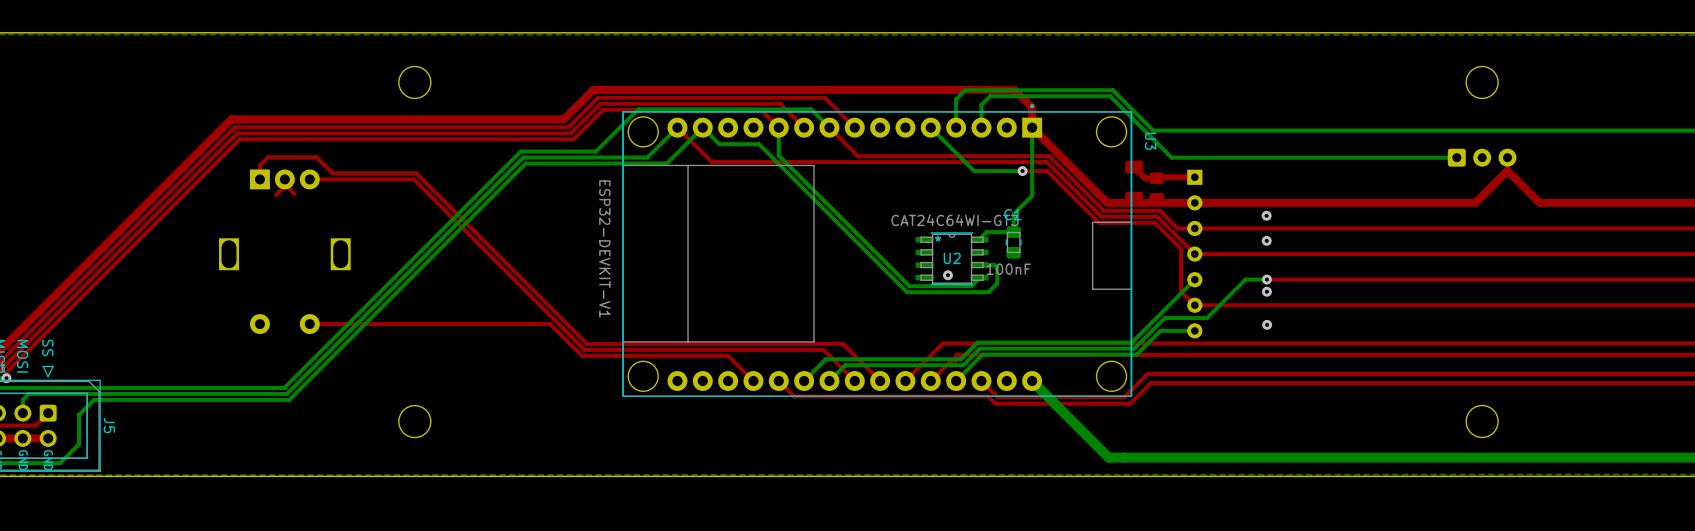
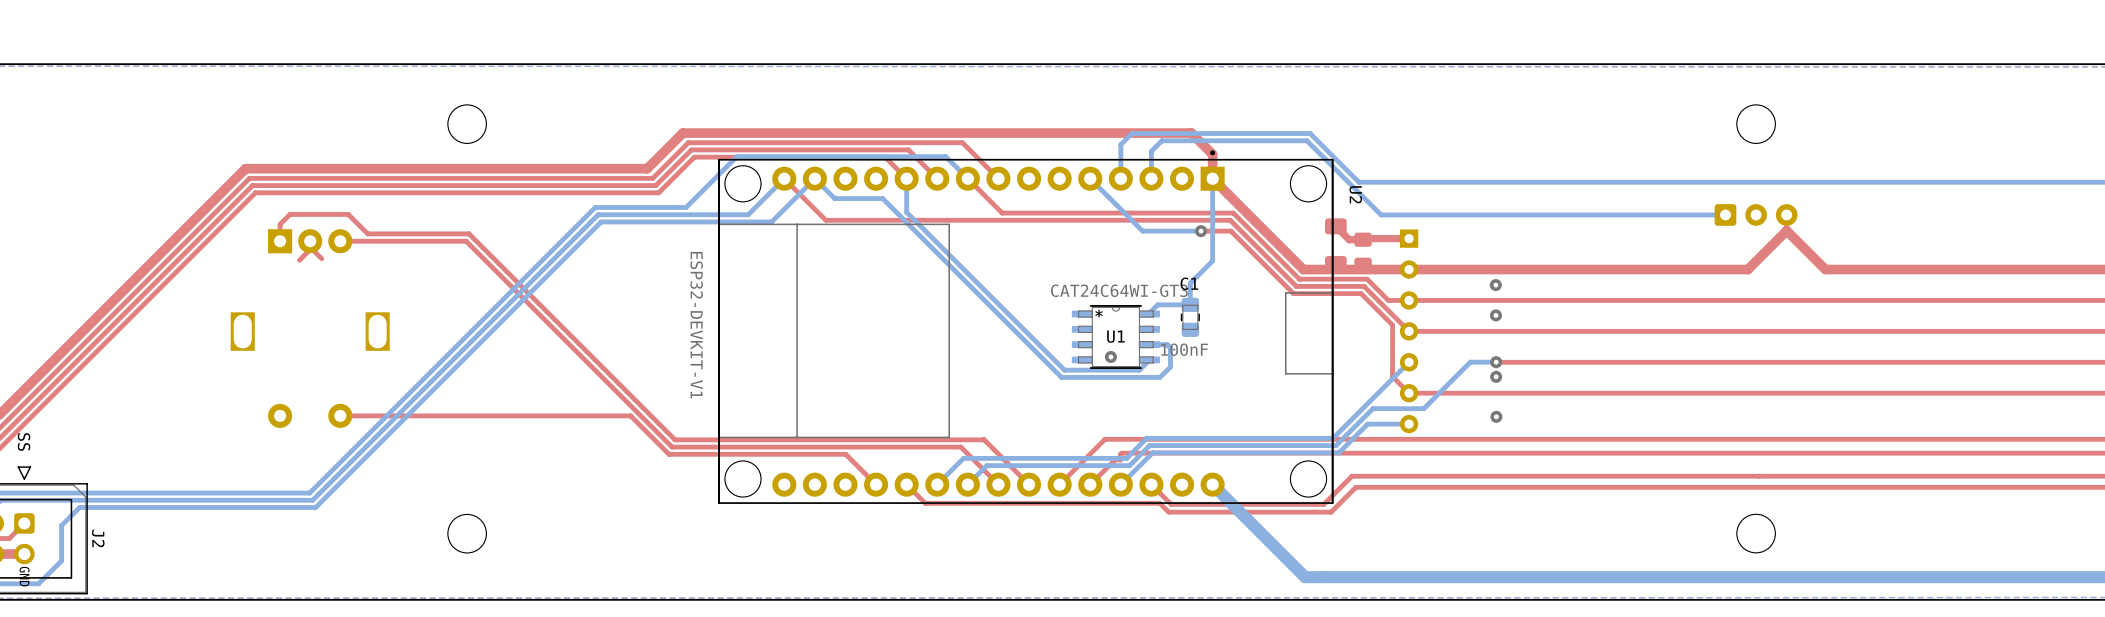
U3 name: U3 (1150, 141) -> U2 (1355, 194)
U2 name: U2 (952, 258) -> U1 (1115, 336)
J5 name: J5 (109, 425) -> J2 (98, 538)

